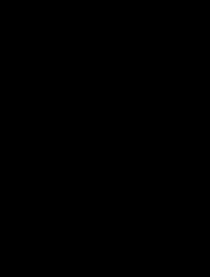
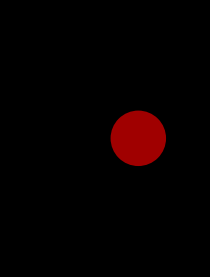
part: none -> (138, 138)

